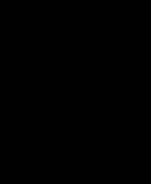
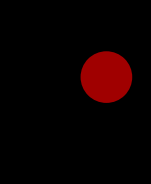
part: none -> (106, 77)

